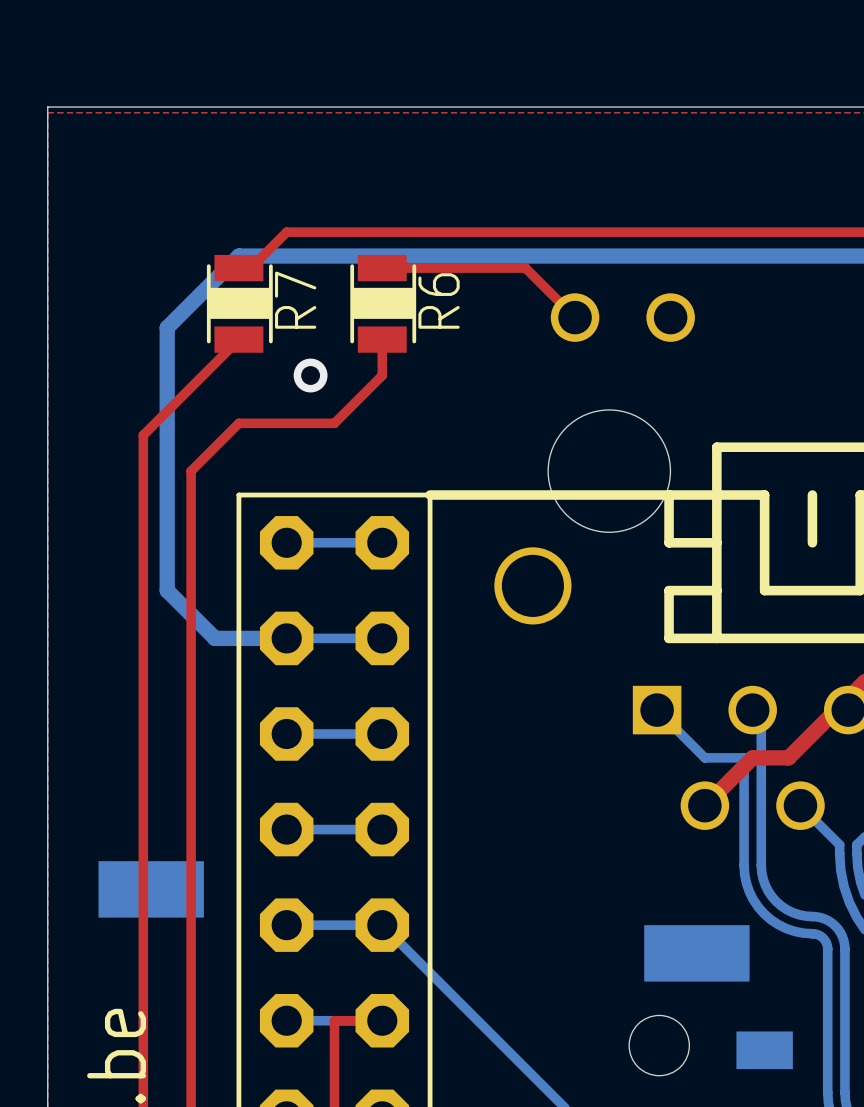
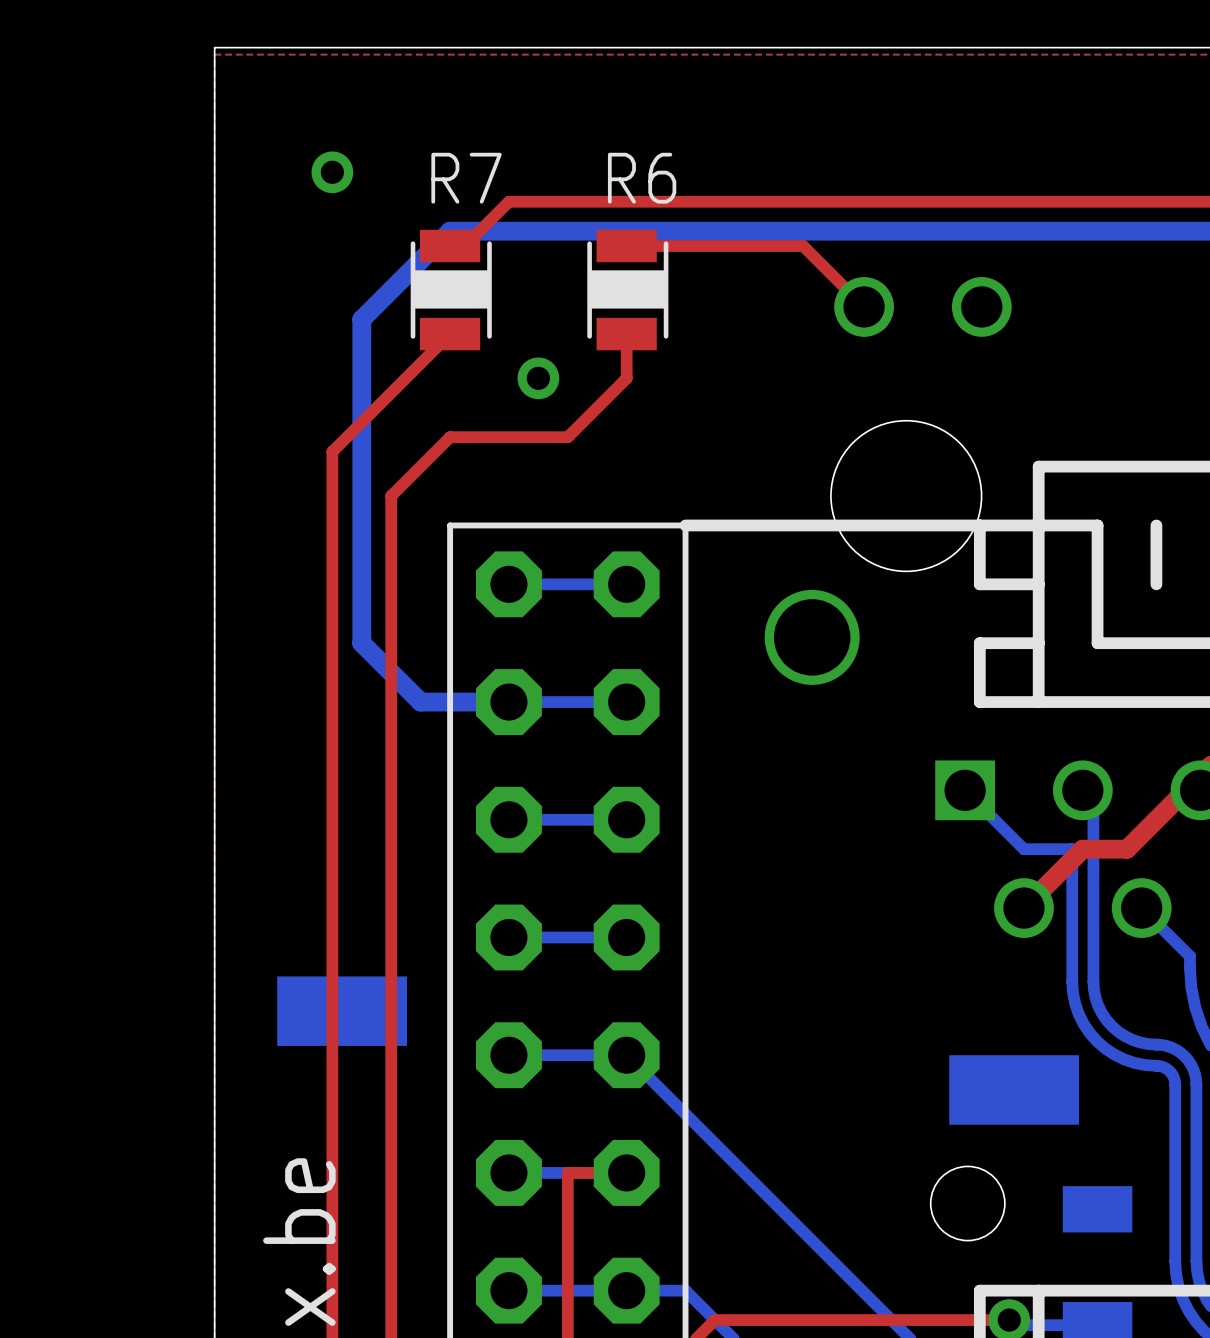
via: none -> (332, 172)
R7 name rotation: 0° (295, 300) -> 90° clockwise (466, 178)
R7 name position: R7 (295, 300) -> R7 (466, 178)
R6 name rotation: 0° (439, 300) -> 90° clockwise (642, 178)
R6 name position: R6 (439, 300) -> R6 (642, 178)

